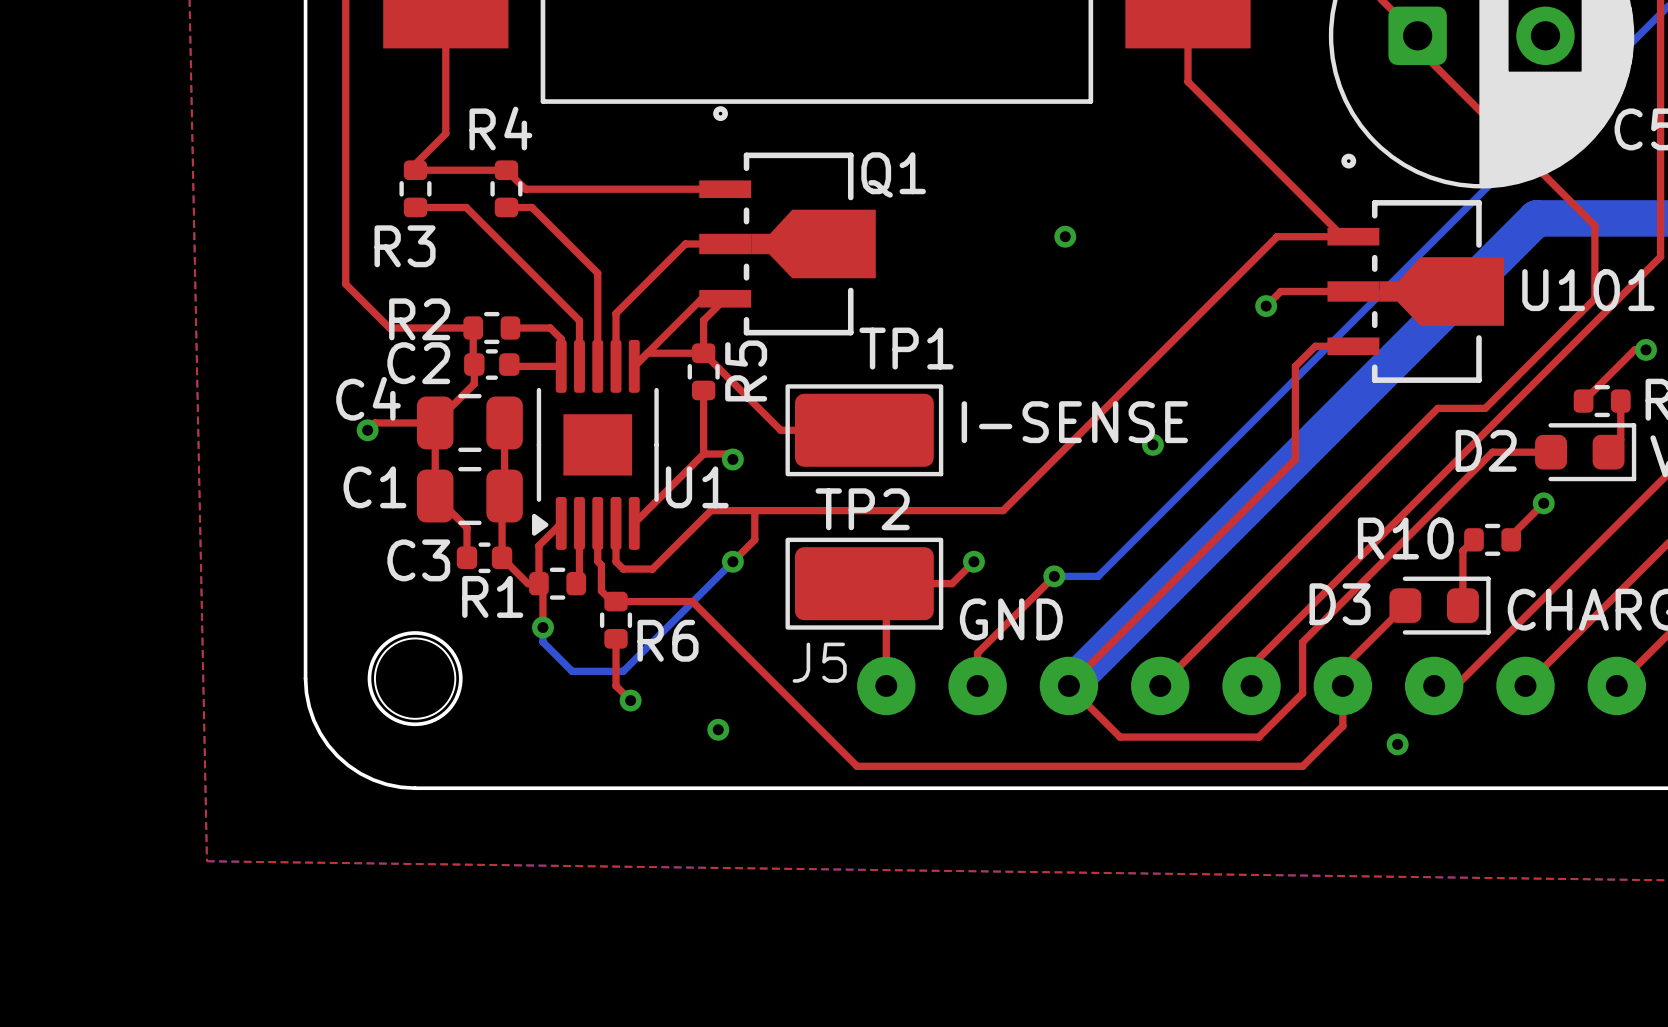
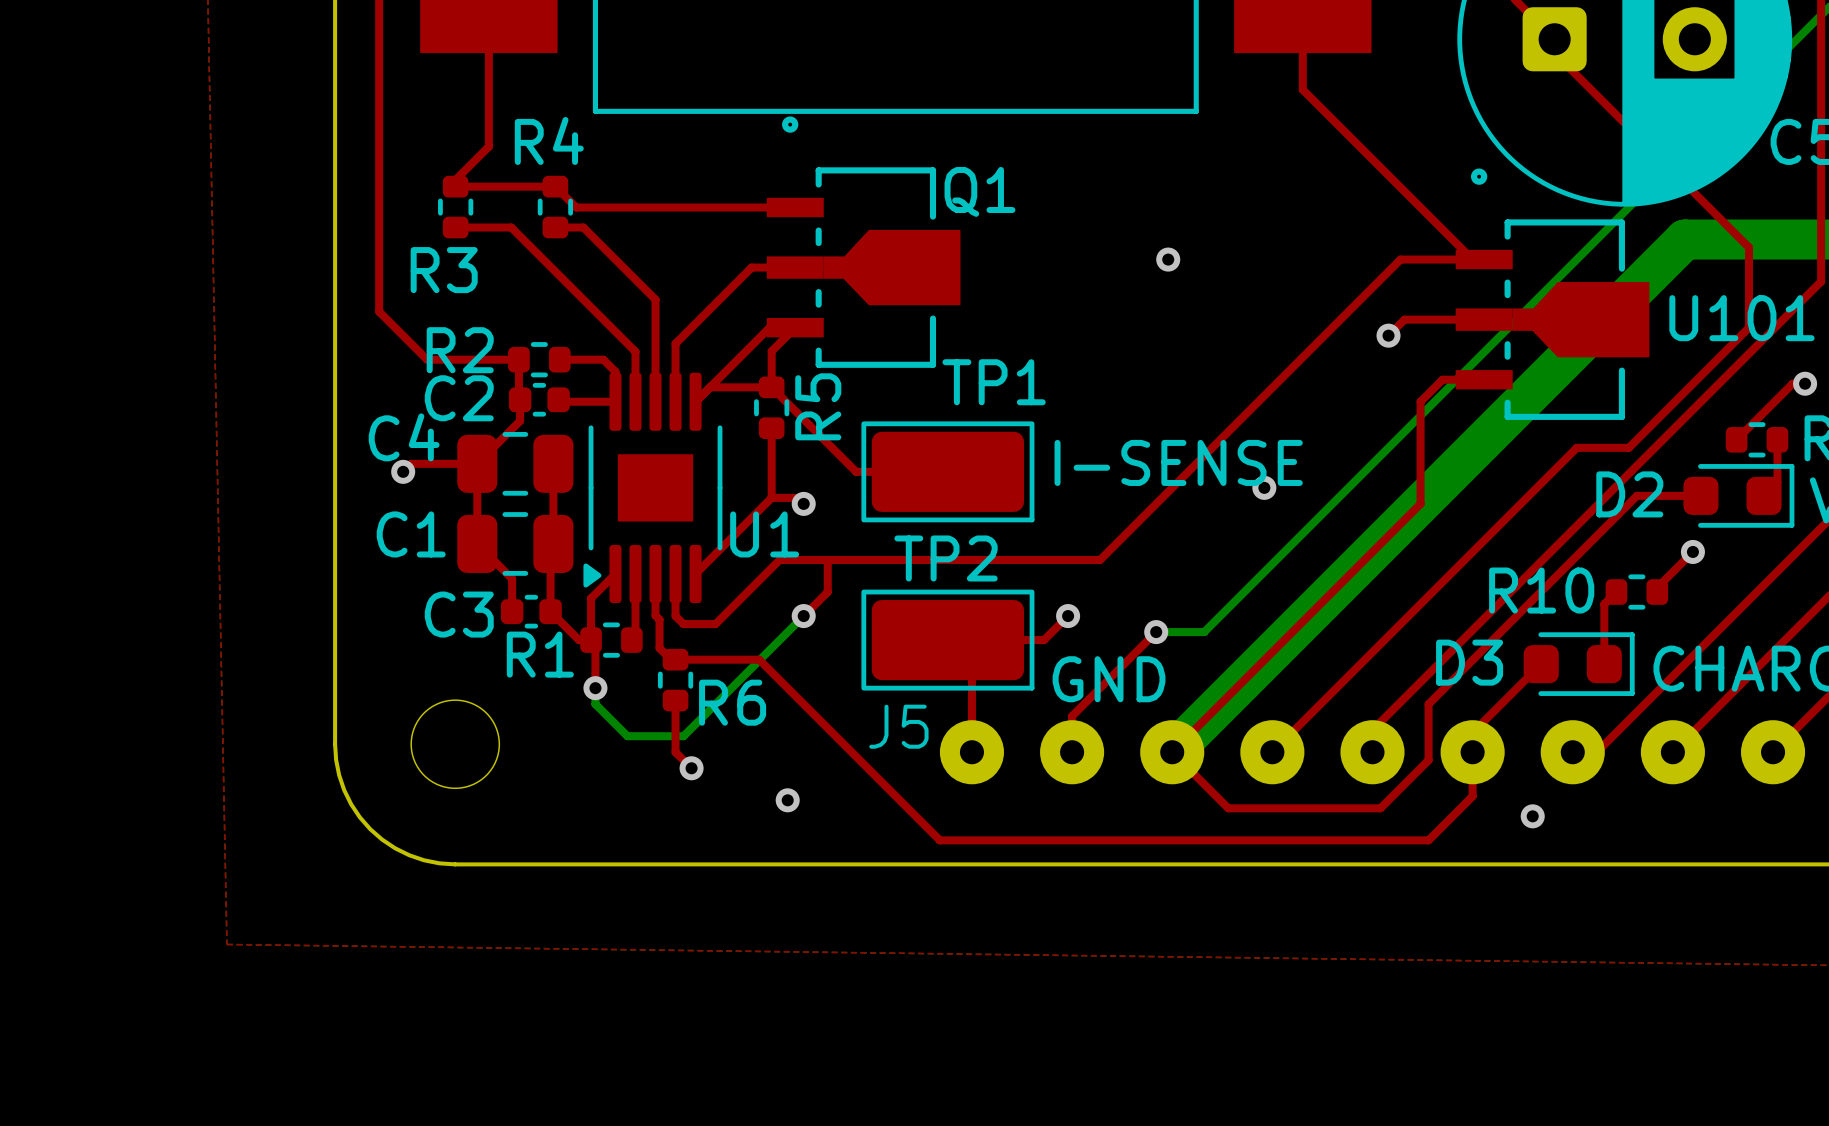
round board edge: [367, 631, 463, 727] -> none

